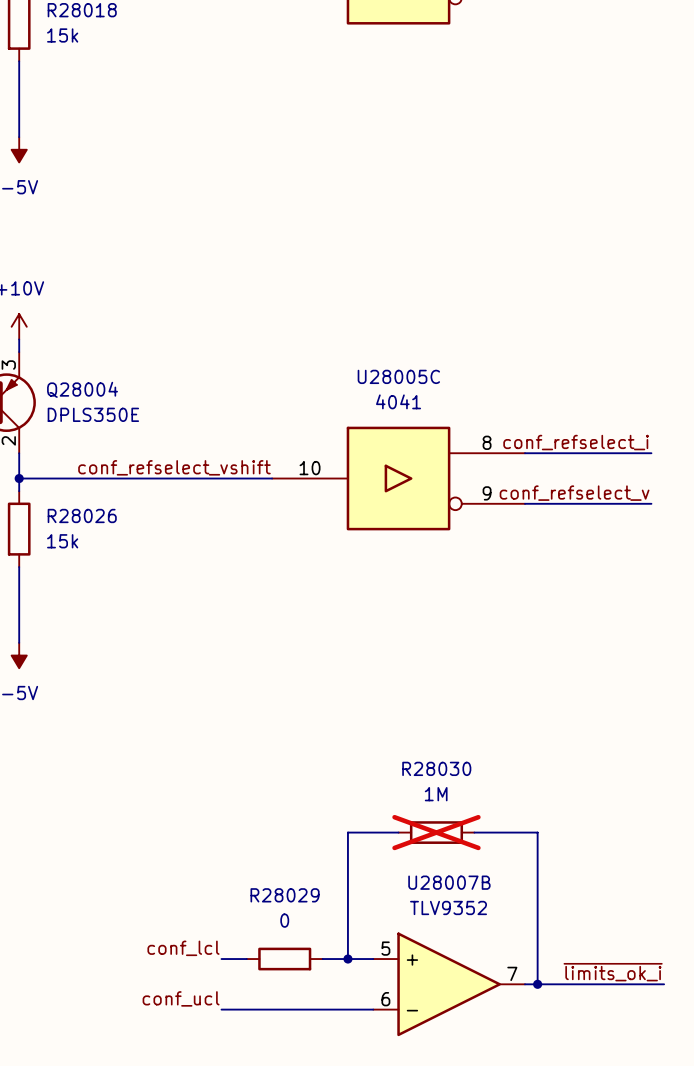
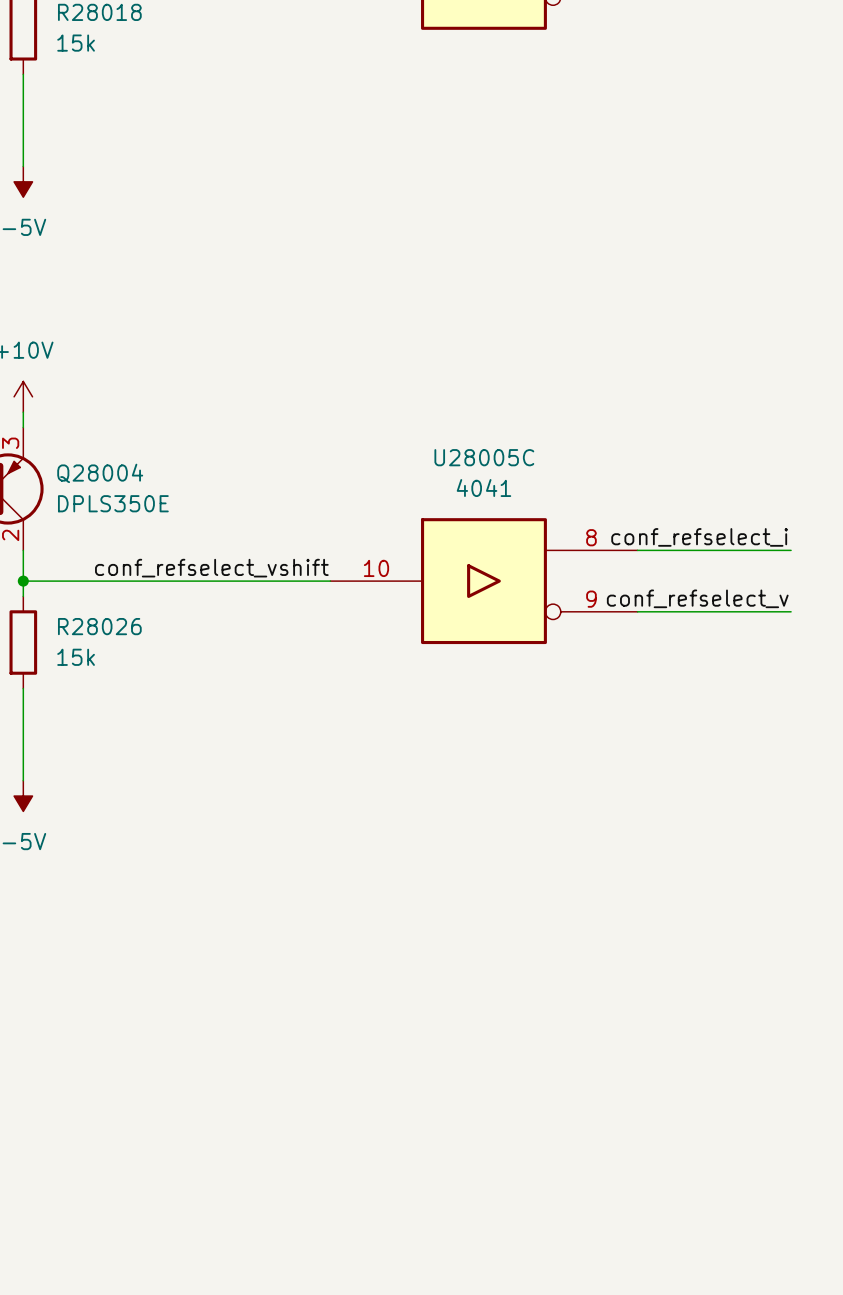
wire: (398, 832) (347, 832) (347, 959) -> none
R28030: 1M (436, 832) -> none
wire: (474, 832) (537, 832) (537, 984) -> none
label: conf_lcl (183, 948) -> none
wire: (221, 959) (246, 959) -> none
R28029: 0 (284, 959) -> none
wire: (322, 959) (373, 959) -> none
junction: (347, 959) -> none
label: ~{limits_ok_i} (613, 972) -> none
U28007B: TLV9352 (449, 984) -> none
wire: (524, 984) (664, 984) -> none
junction: (537, 984) -> none
label: conf_ucl (181, 998) -> none
wire: (221, 1009) (373, 1009) -> none

